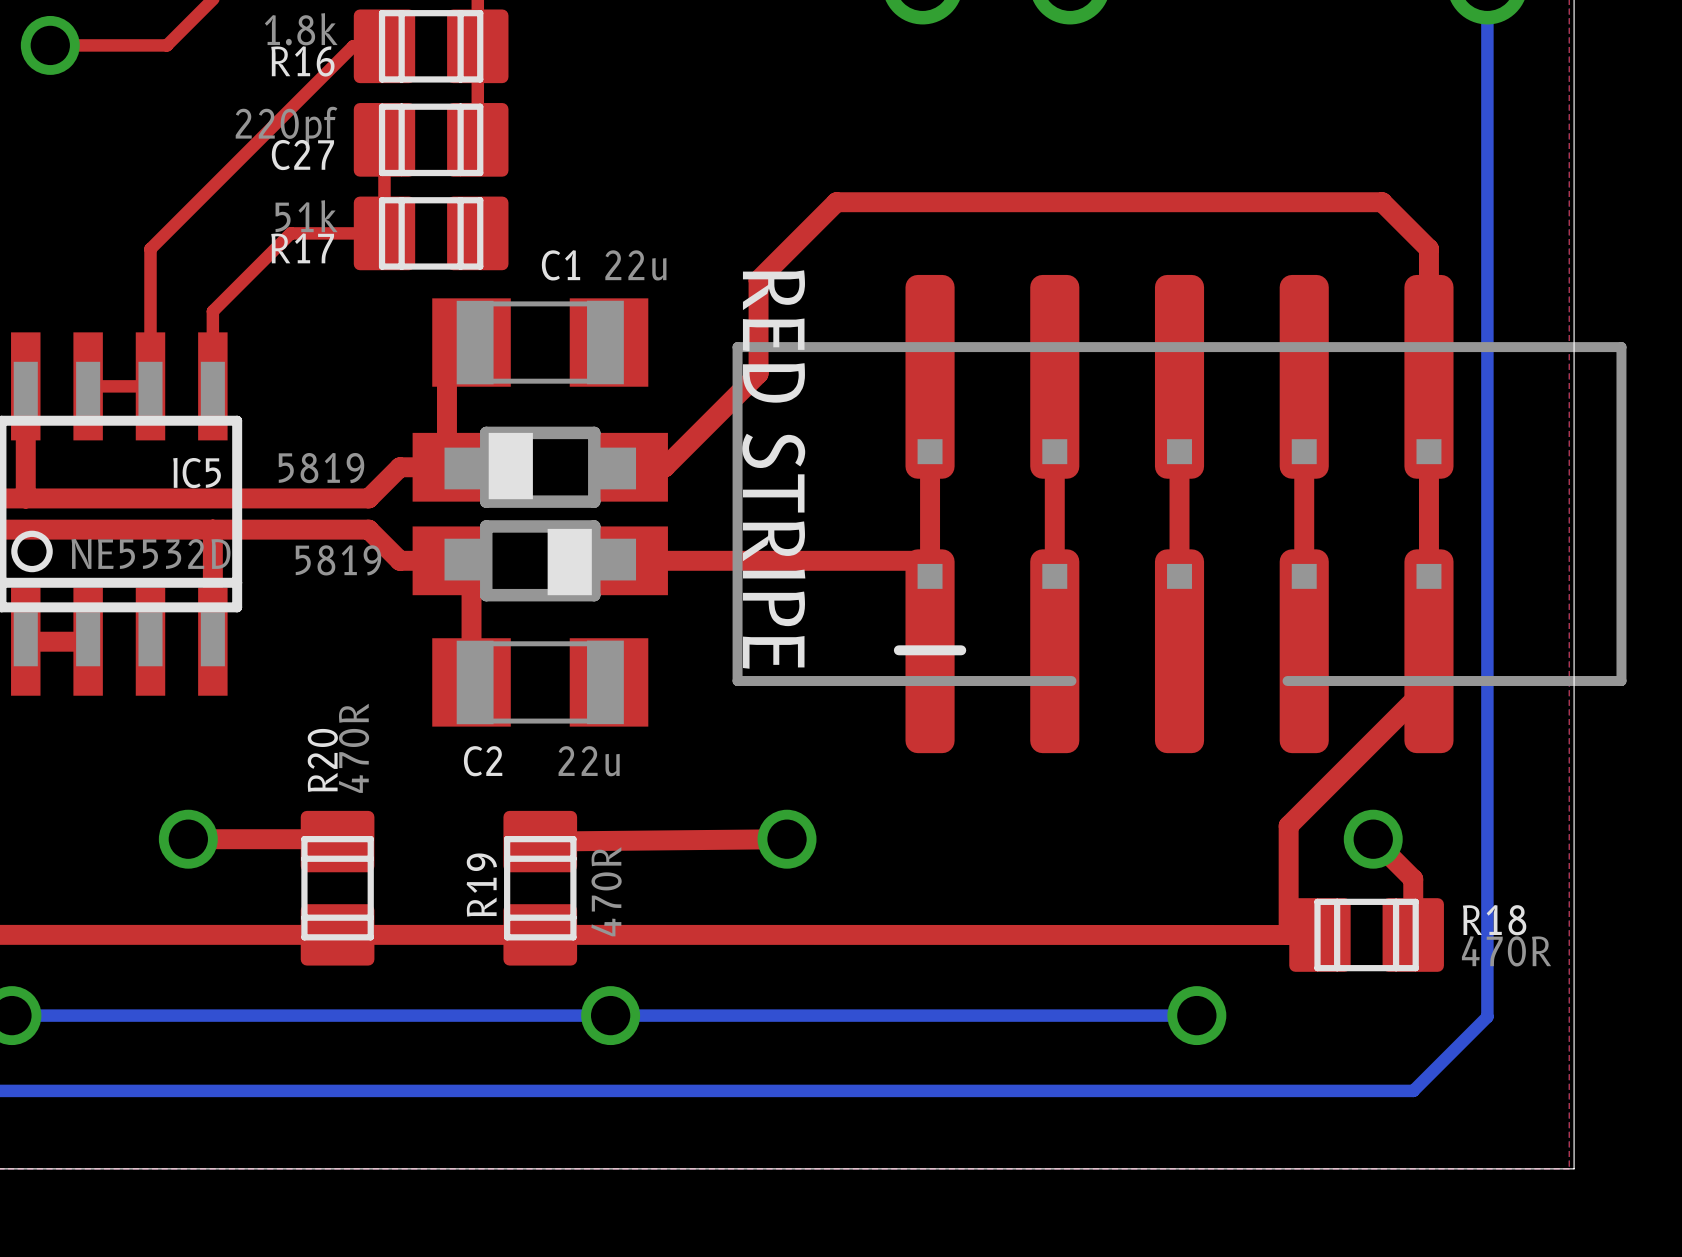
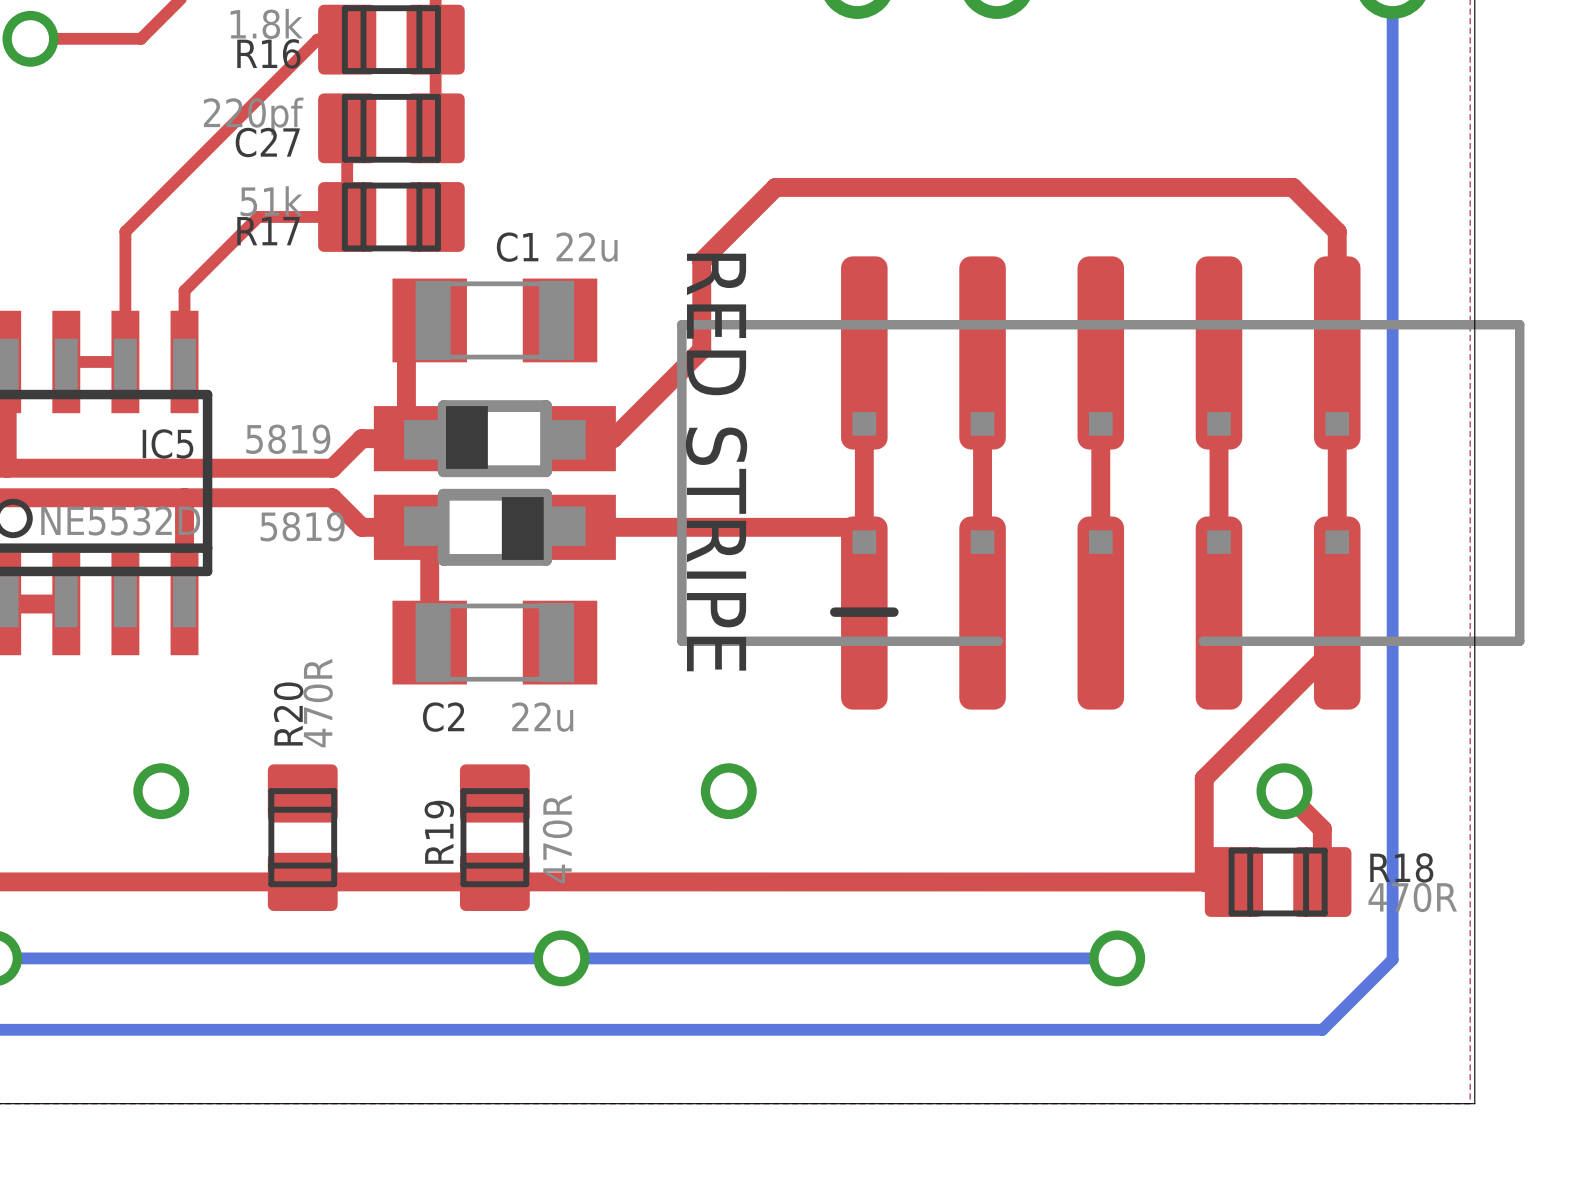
top track: (188, 839) (335, 839) -> none
top track: (787, 839) (540, 841) -> none

